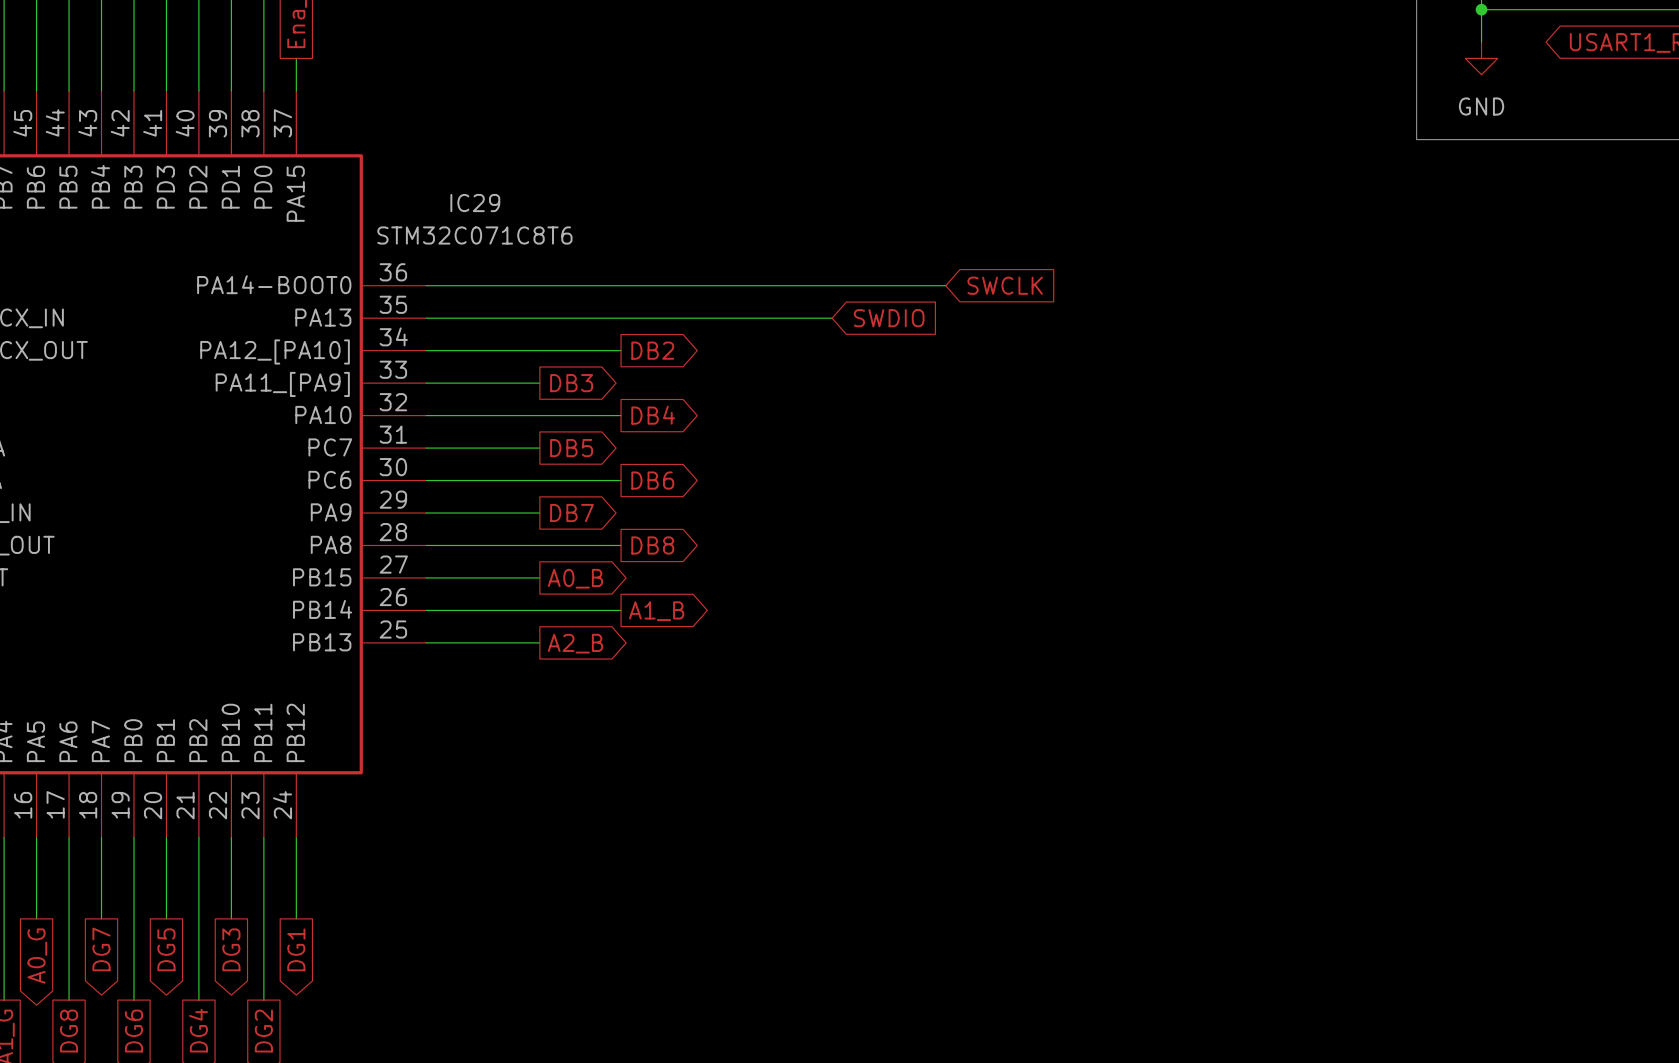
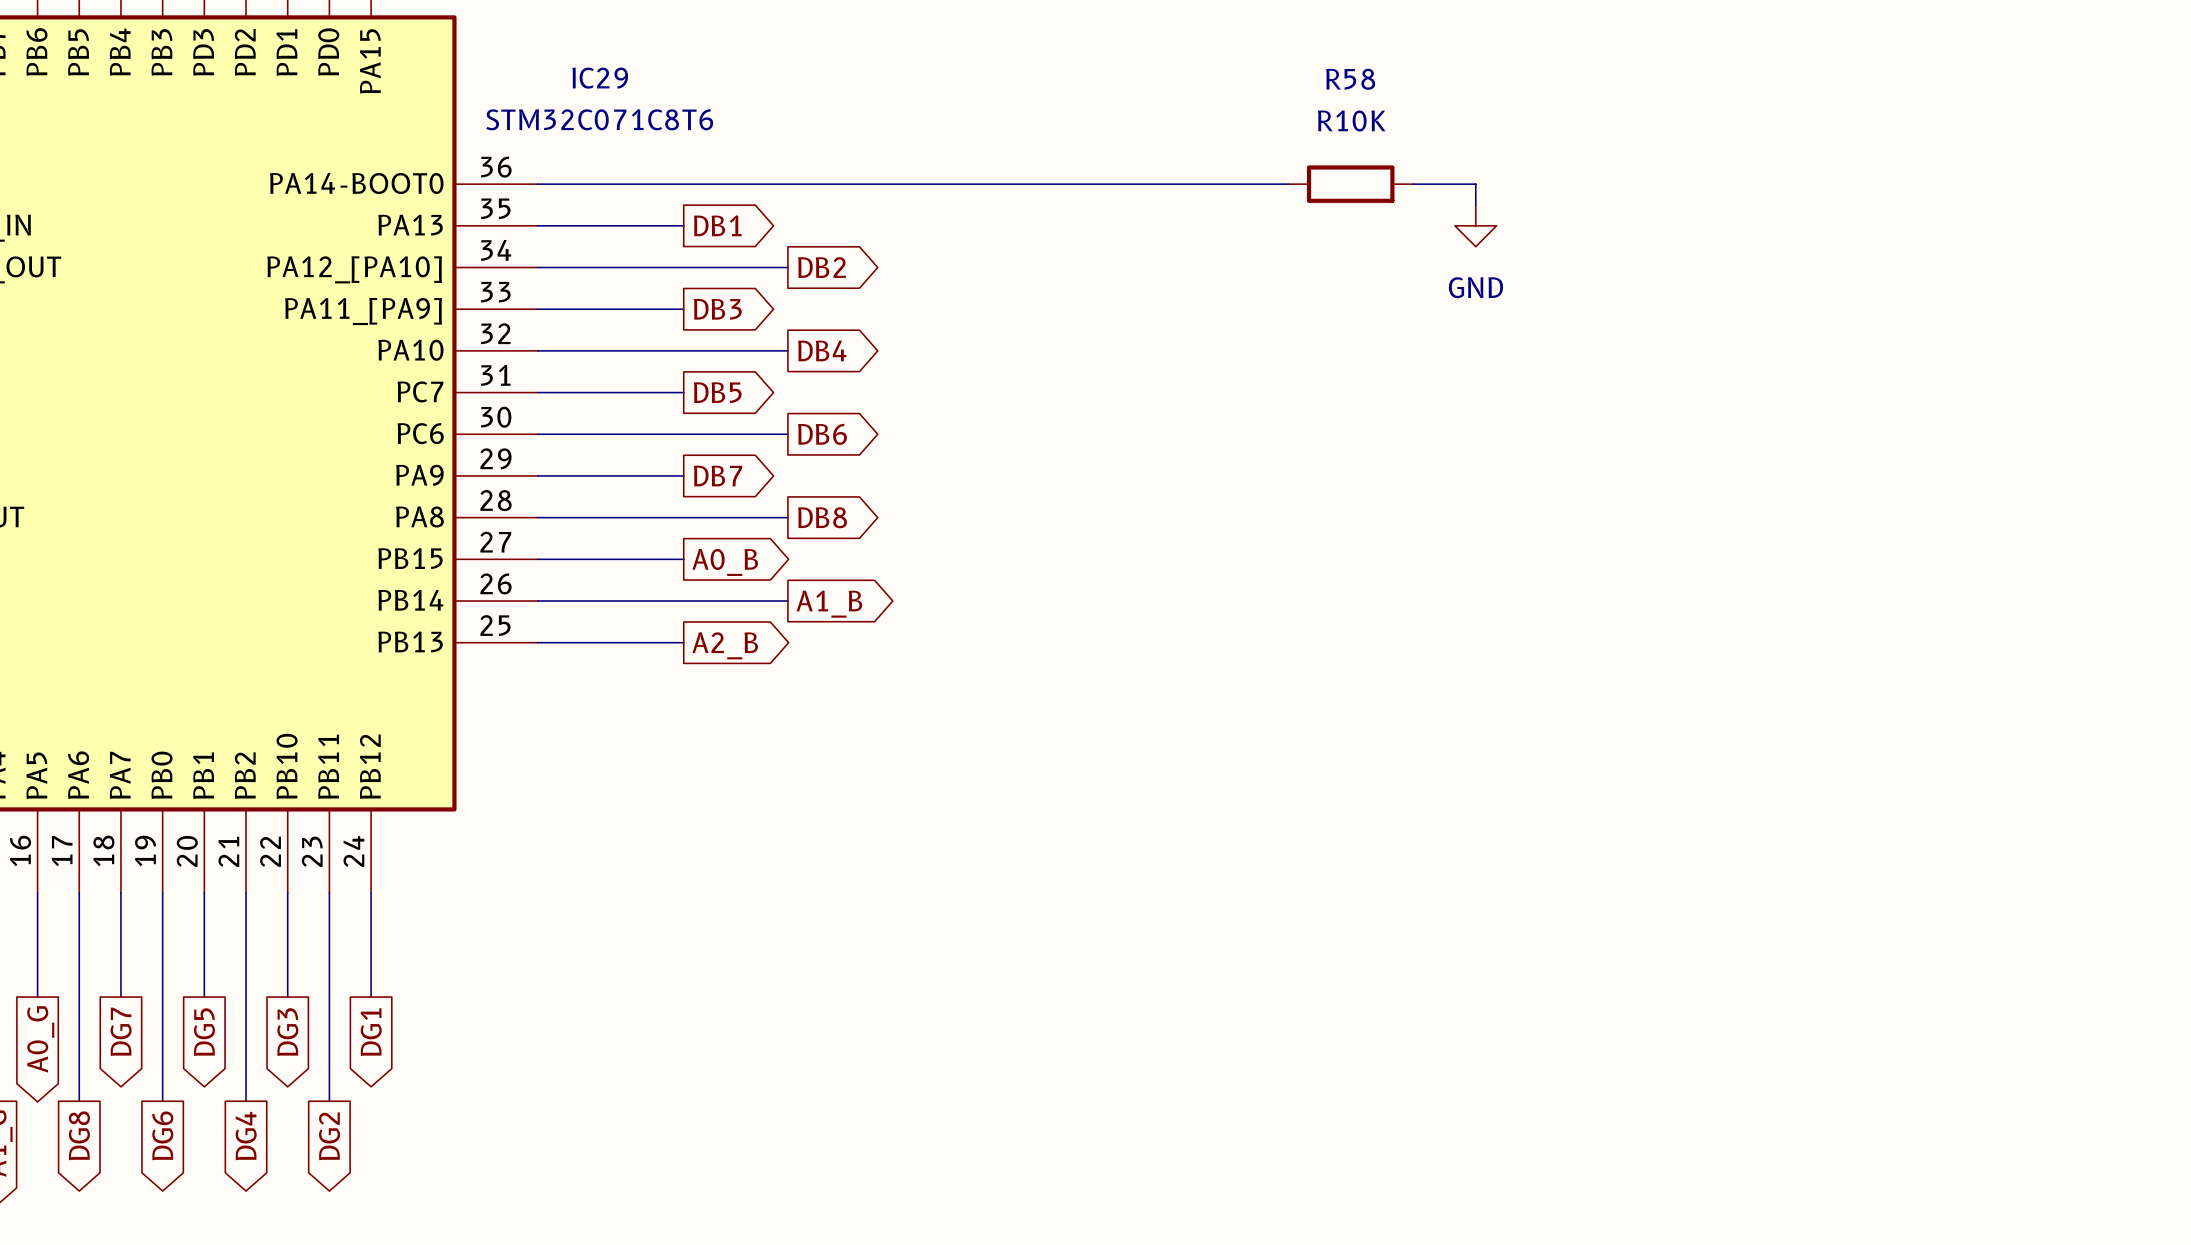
wire: none -> (1204, 184) (1288, 184)
global label: SWCLK (1005, 285) -> none
R58: none -> R10K (1350, 184)
wire: none -> (1413, 184) (1475, 184) (1475, 204)
wire: (539, 318) (832, 318) -> none
global label: none -> DB1 (717, 225)
global label: SWDIO (889, 318) -> none
power symbol: none -> GND (1475, 225)

